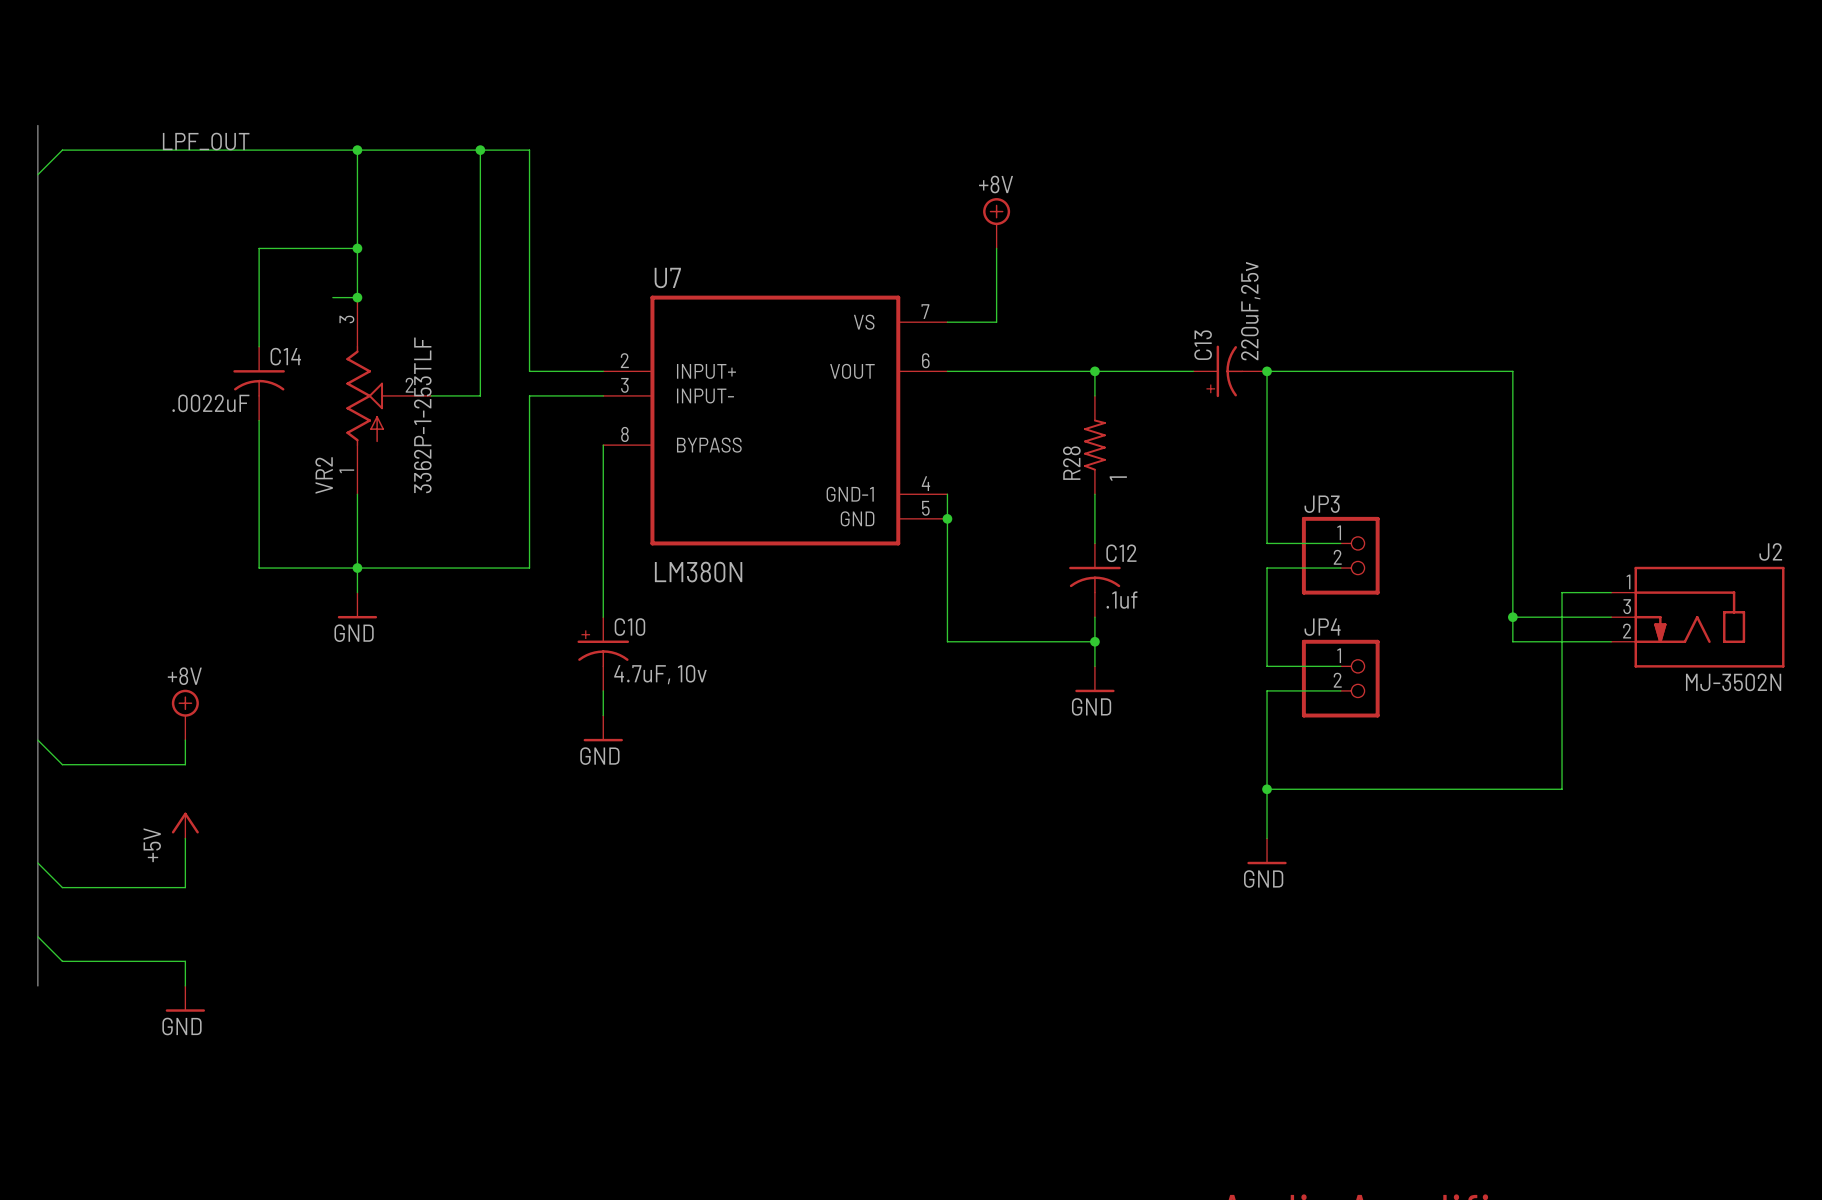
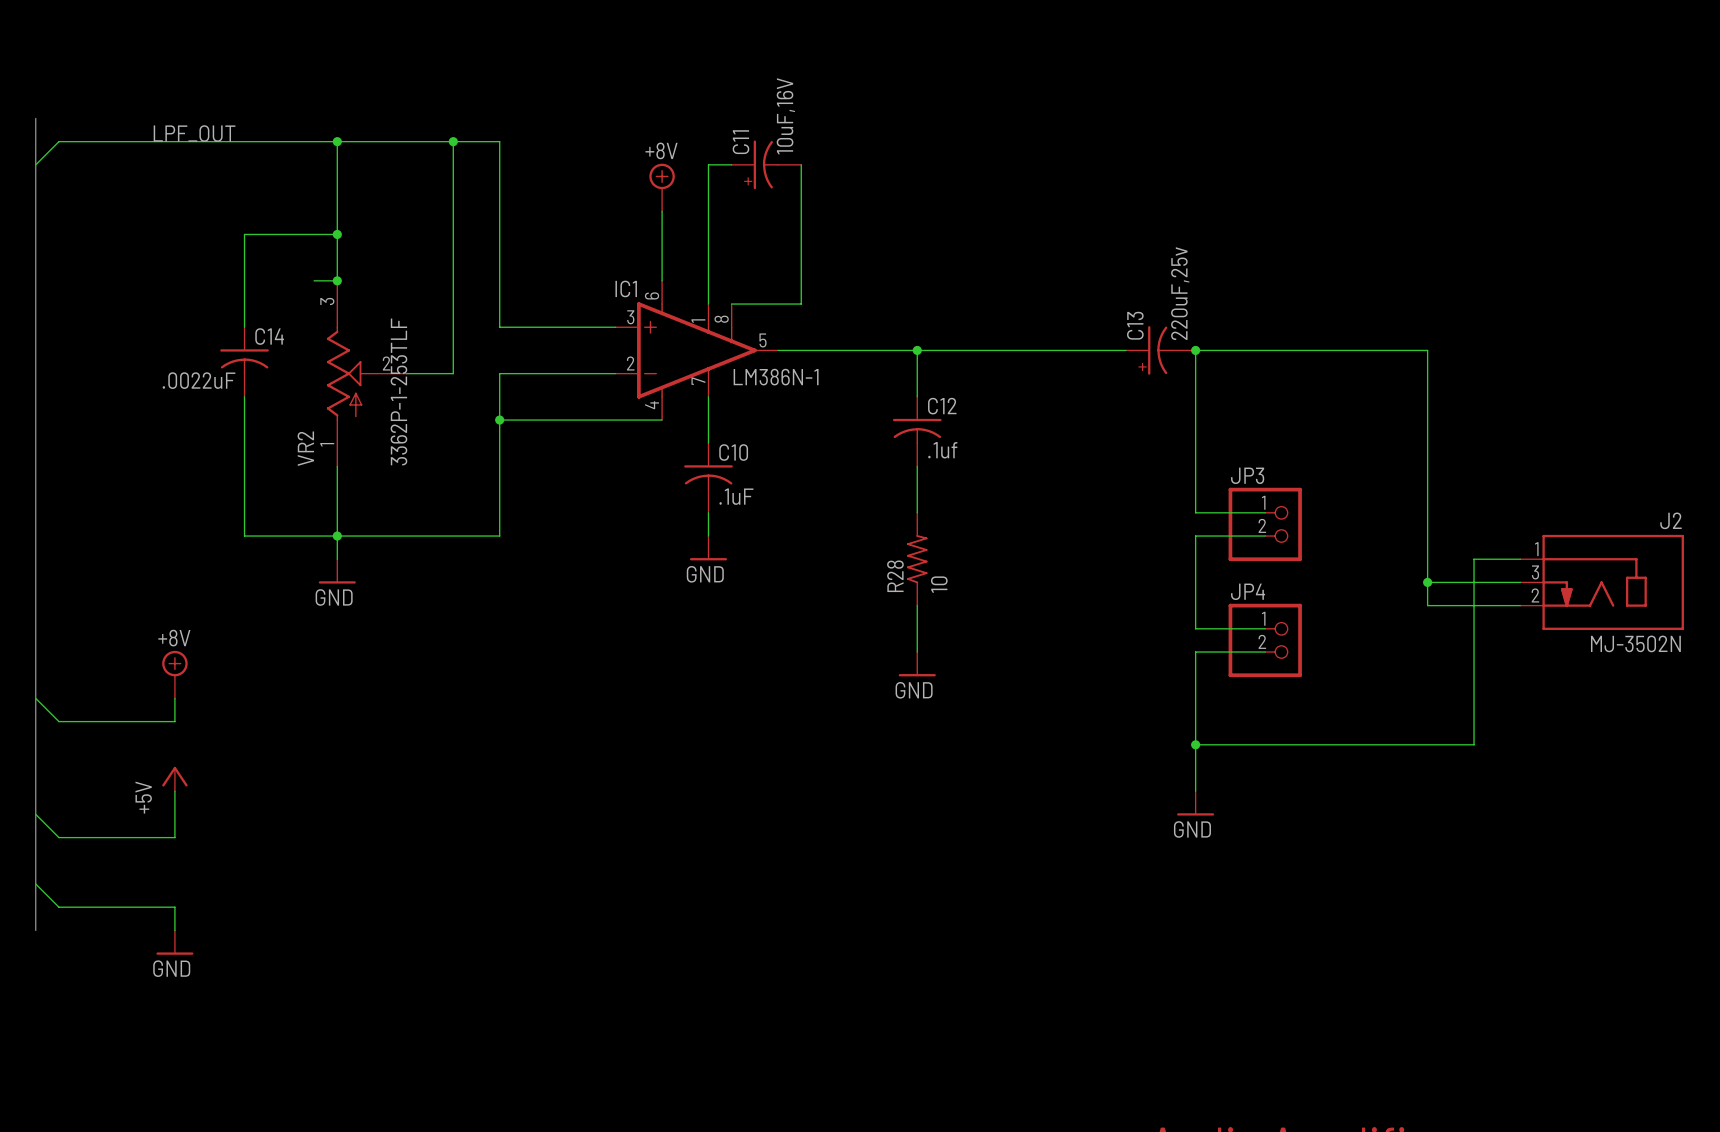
wire: none -> (731, 164) (708, 164) (708, 304)
C11: none -> 10uF,16V (766, 164)
wire: none -> (801, 164) (801, 304) (731, 304)
power symbol: none -> +8V (662, 187)
wire: none -> (662, 211) (662, 280)
power symbol: +8V (996, 223) -> none
wire: (996, 248) (996, 322) (947, 322) -> none
wire: (529, 346) (529, 371) (603, 371) -> (499, 327) (615, 327)
IC1: none -> LM386N-1 (696, 350)
wire: none -> (778, 350) (894, 350)
junction: none -> (917, 350)
wire: (1094, 371) (1094, 395) -> none
junction: (1094, 371) -> none
wire: none -> (708, 396) (708, 443)
U7: LM380N (775, 420) -> none
wire: none -> (499, 420) (662, 420)
junction: none -> (499, 420)
wire: (603, 445) (603, 617) -> none
R28 position: (1094, 445) -> (917, 559)
R28 value: 1 (1118, 478) -> 10 (939, 584)
wire: (947, 494) (947, 641) (1094, 641) -> none
wire: (1094, 494) (1094, 543) -> (917, 350) (917, 396)
junction: (947, 518) -> none
power symbol: none -> GND (708, 548)
C12 position: (1094, 580) -> (917, 431)
C10 symbol: [577, 617, 630, 691] -> [684, 443, 733, 513]
wire: (1094, 617) (1094, 666) -> (917, 466) (917, 512)
wire: none -> (917, 605) (917, 652)
junction: (1094, 641) -> none
C10 value: 4.7uF, 10v (660, 674) -> .1uF (736, 496)
power symbol position: GND (1094, 679) -> GND (917, 664)
wire: (603, 690) (603, 715) -> (708, 512) (708, 536)
power symbol: GND (603, 728) -> none

